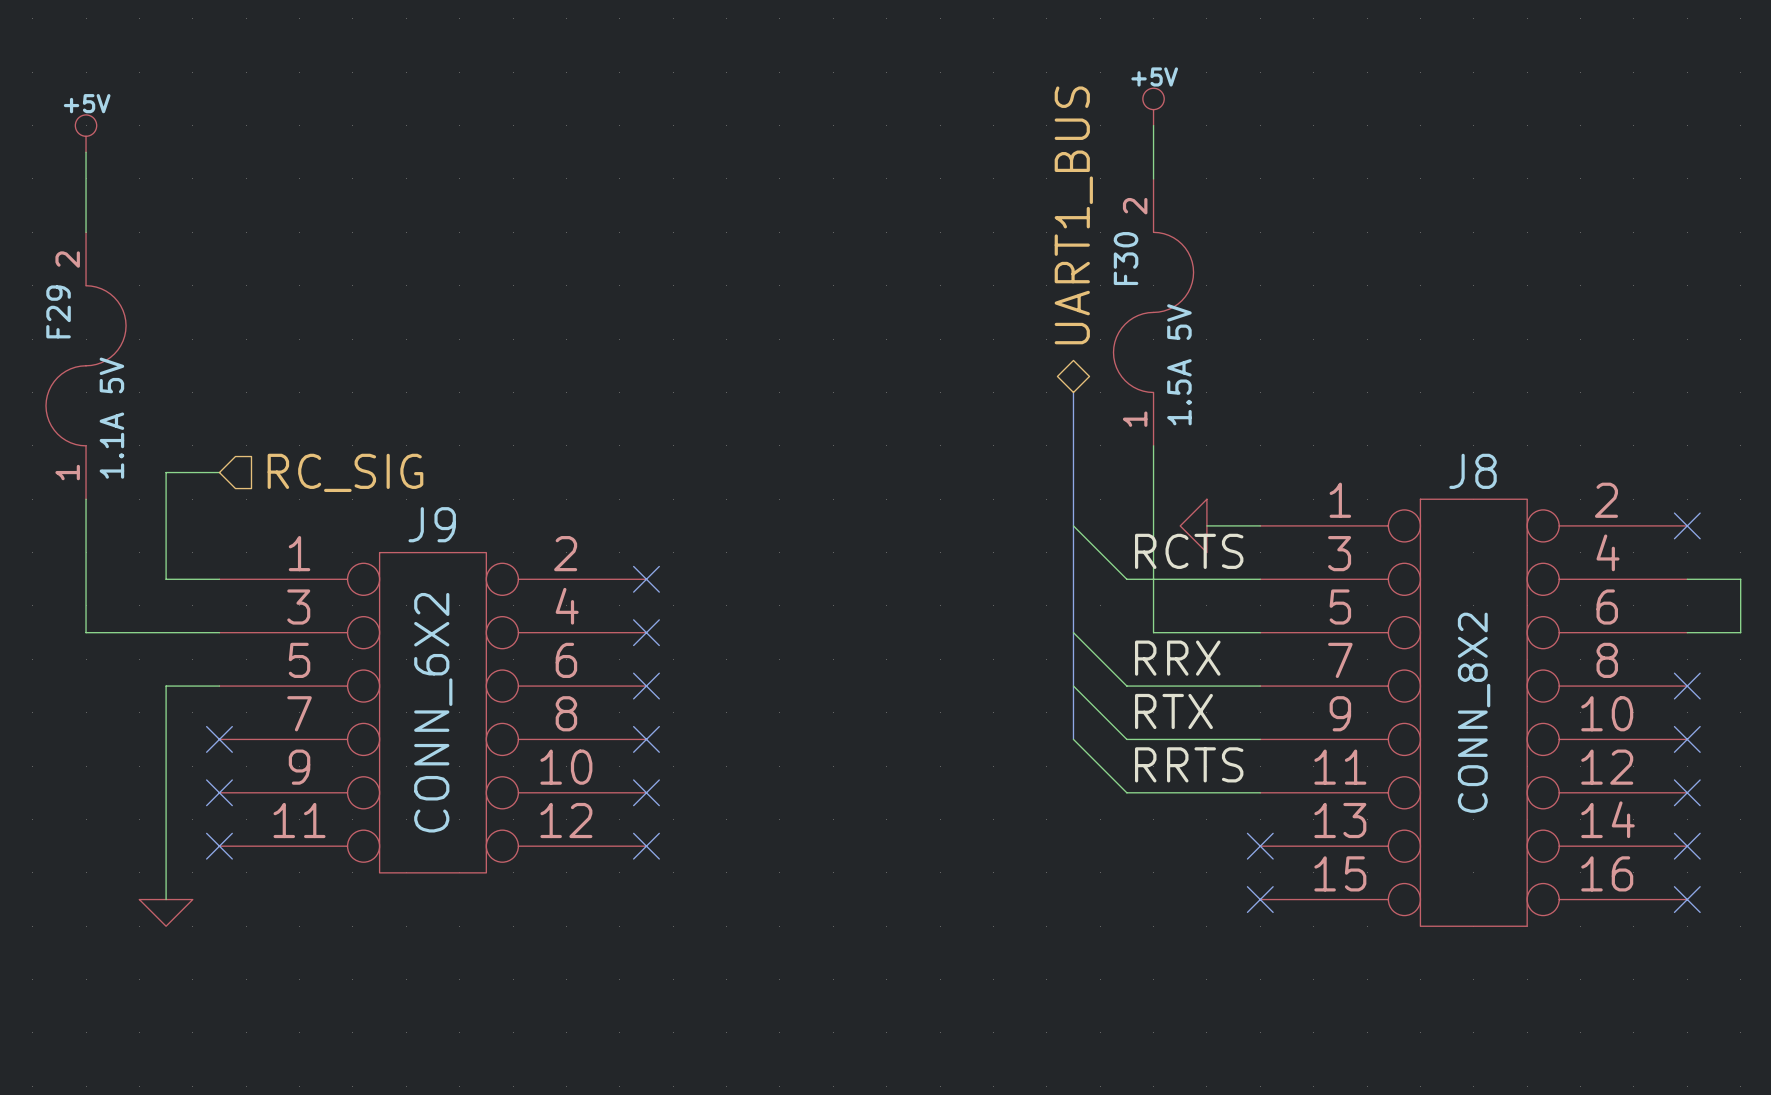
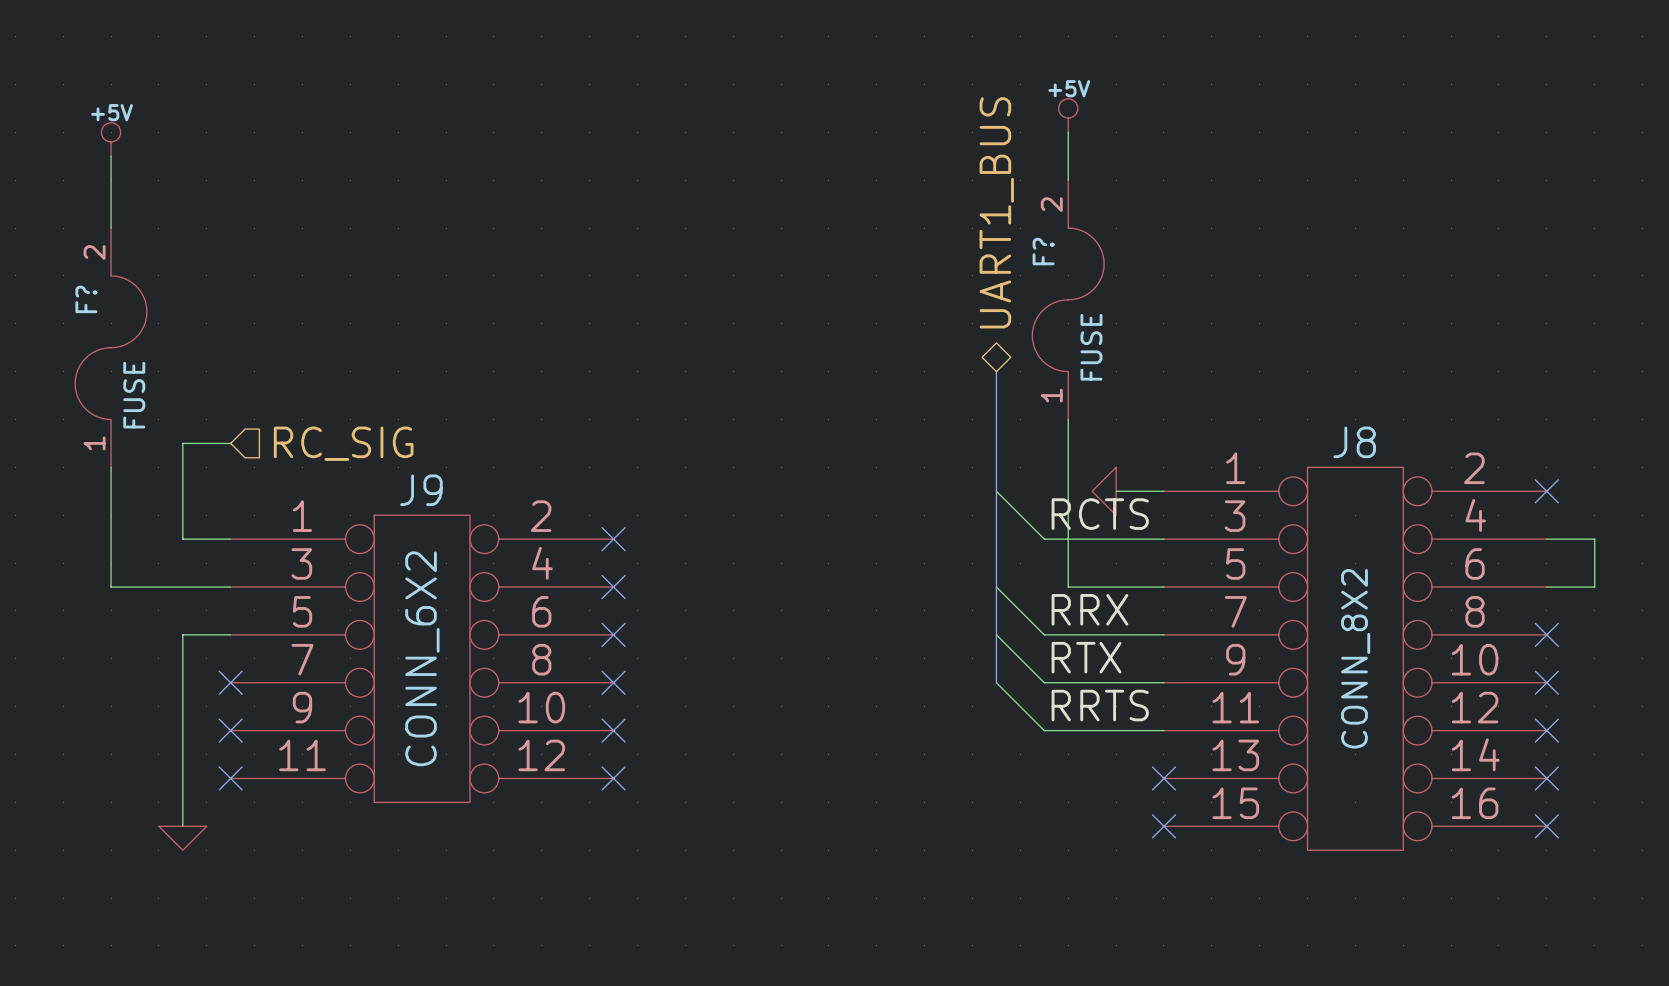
F30 name: F30 (1126, 258) -> F? (1043, 251)
F29 name: F29 (58, 311) -> F? (86, 299)
F30 value: 1.5A 5V (1179, 364) -> FUSE (1091, 347)
F29 value: 1.1A 5V (111, 418) -> FUSE (134, 395)

